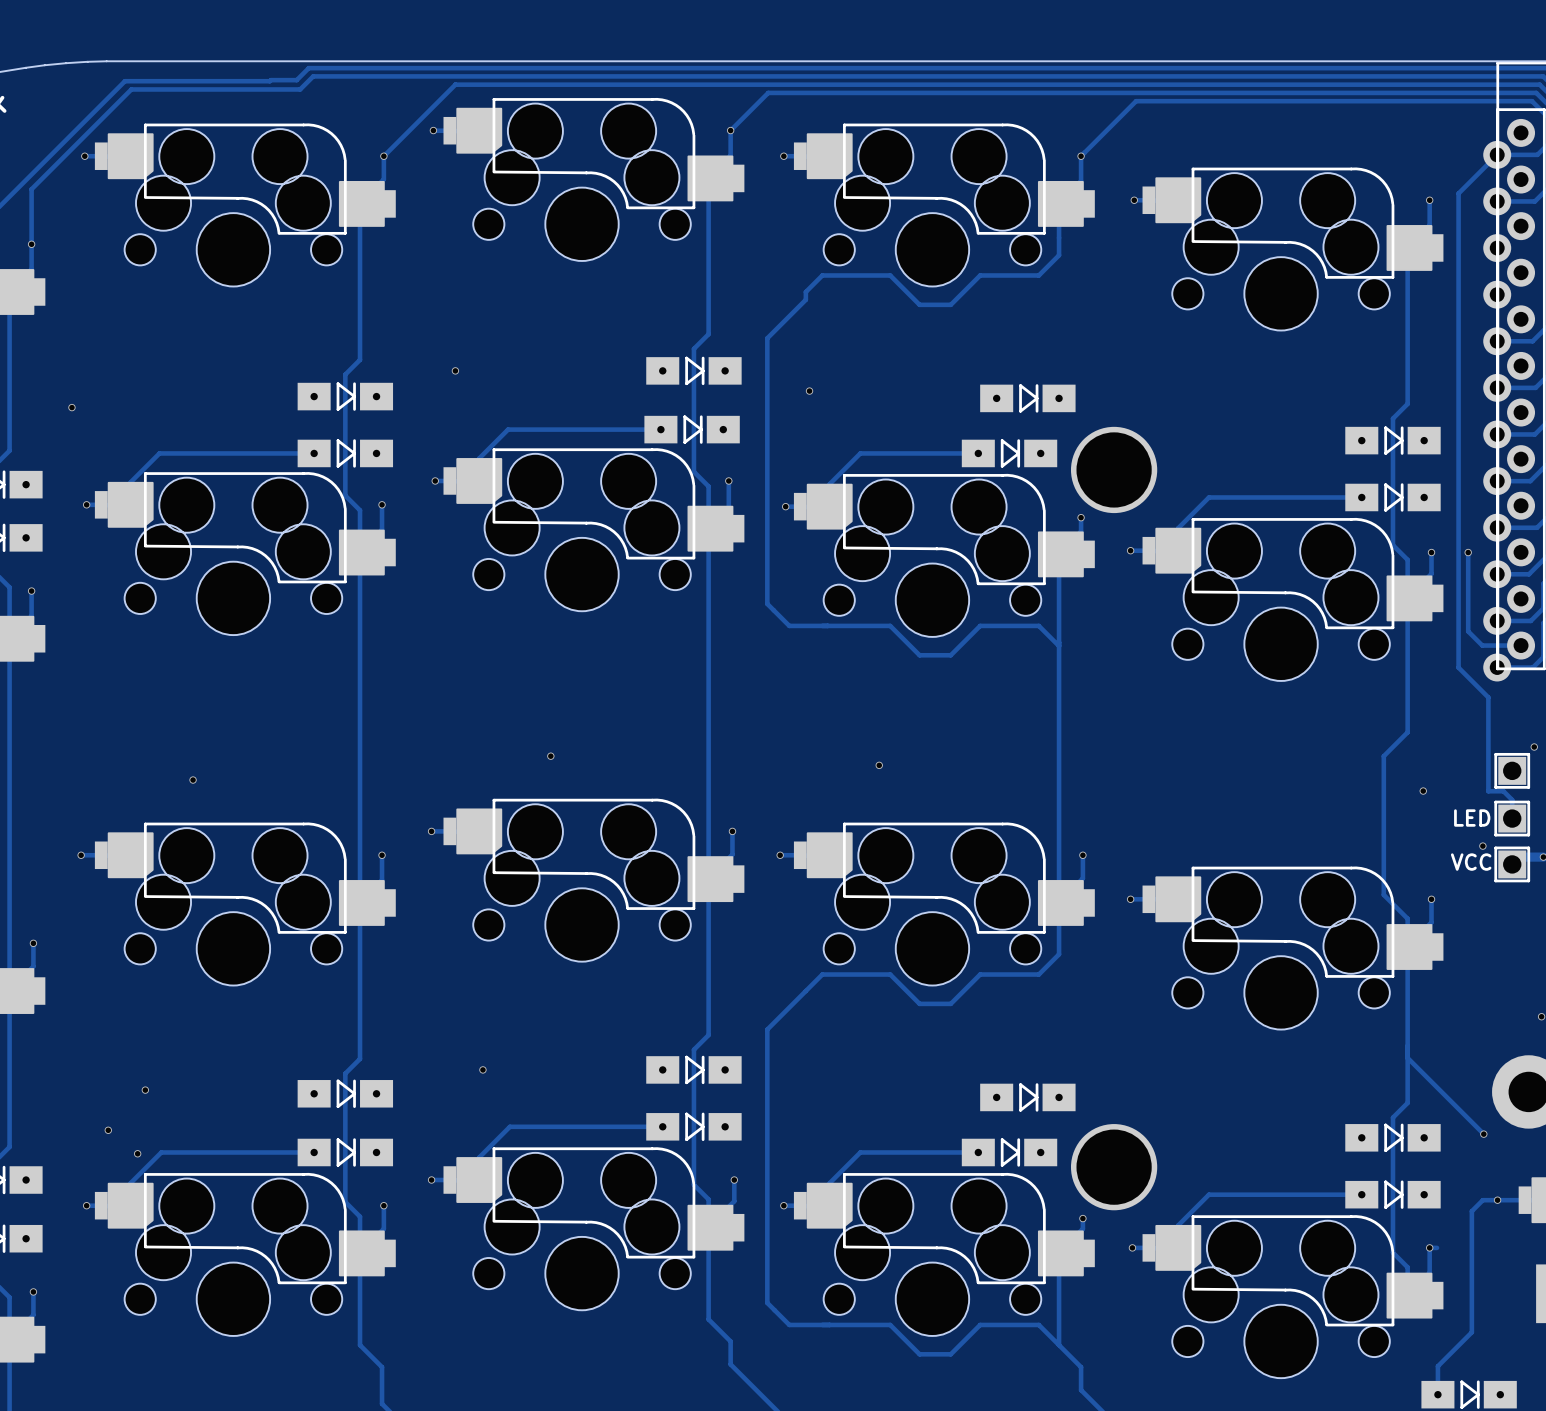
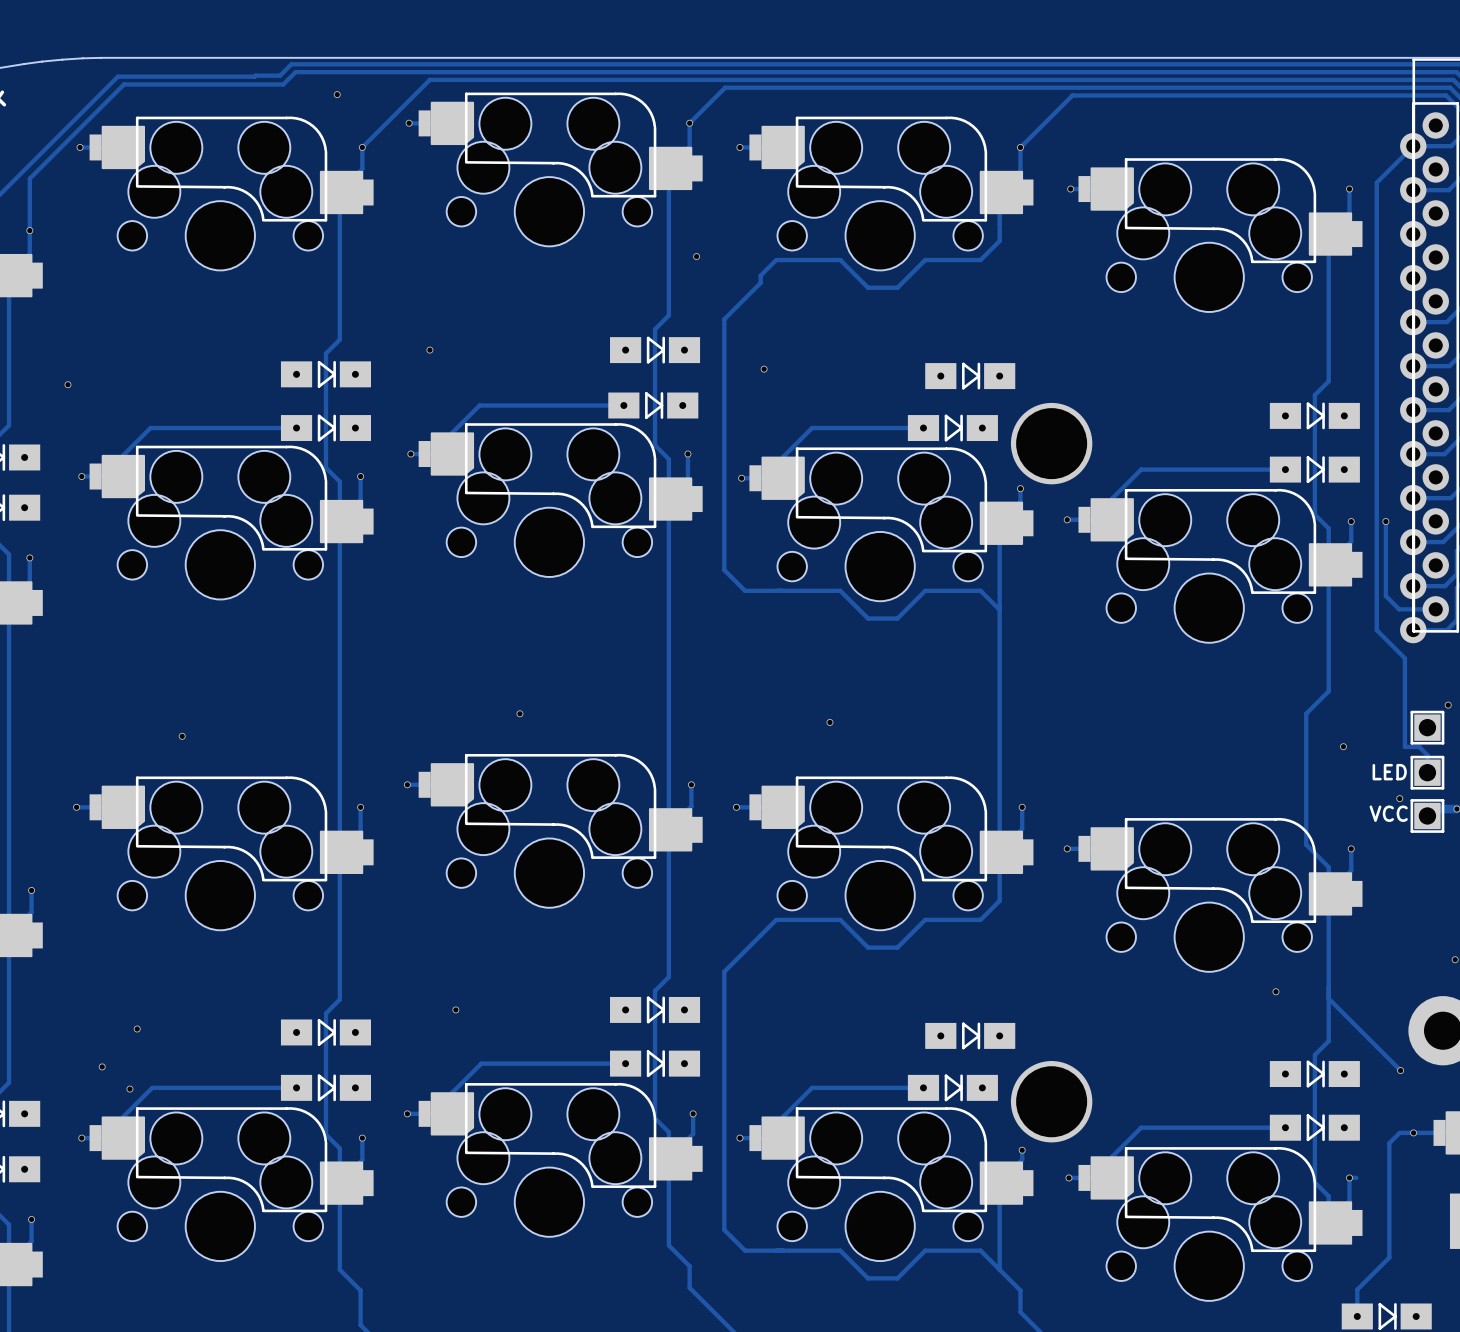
via: none -> (337, 94)
via: none -> (696, 256)
via: none -> (1275, 991)

